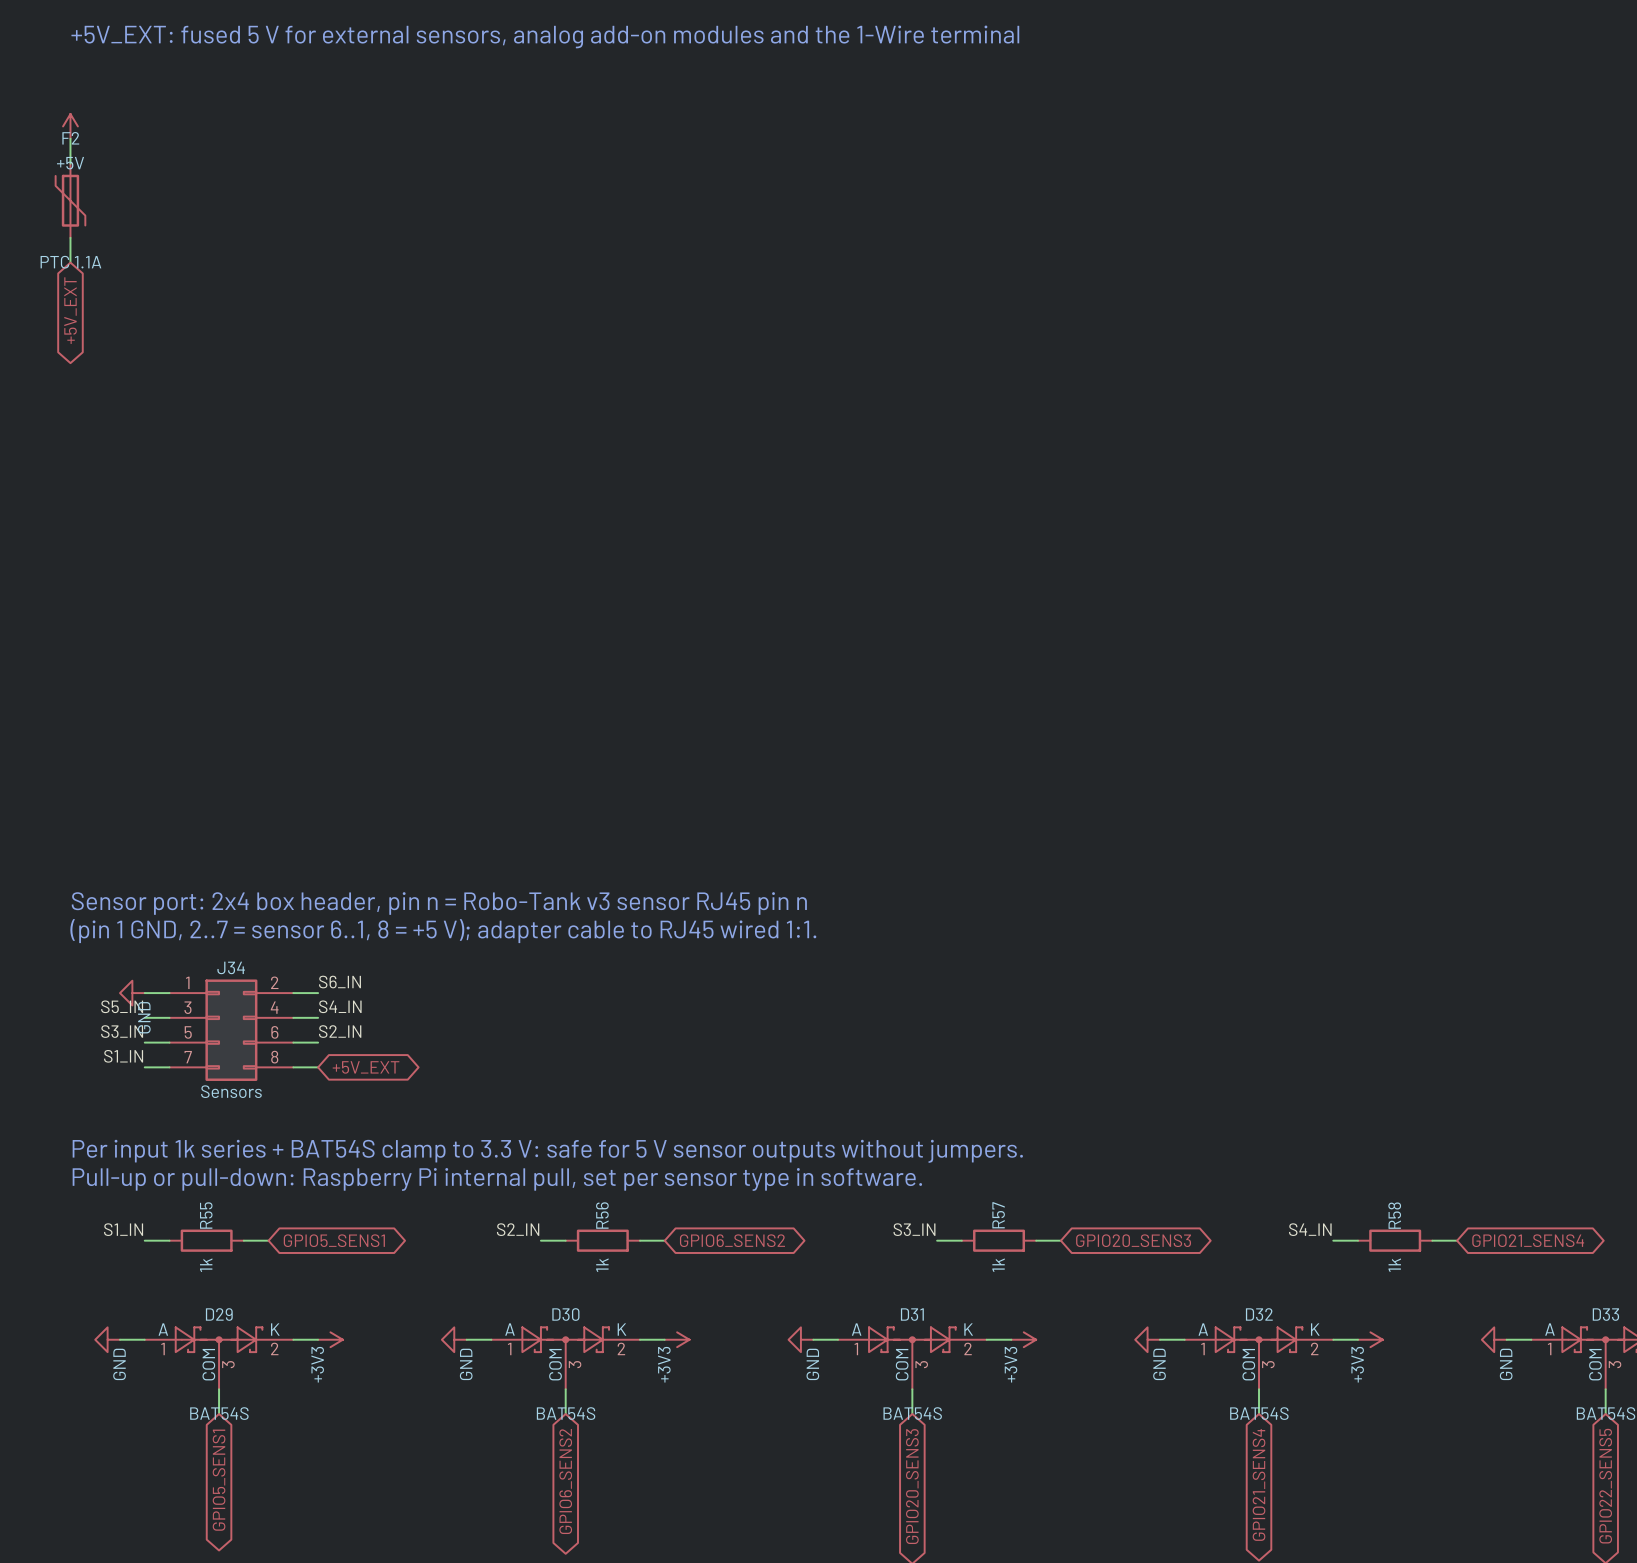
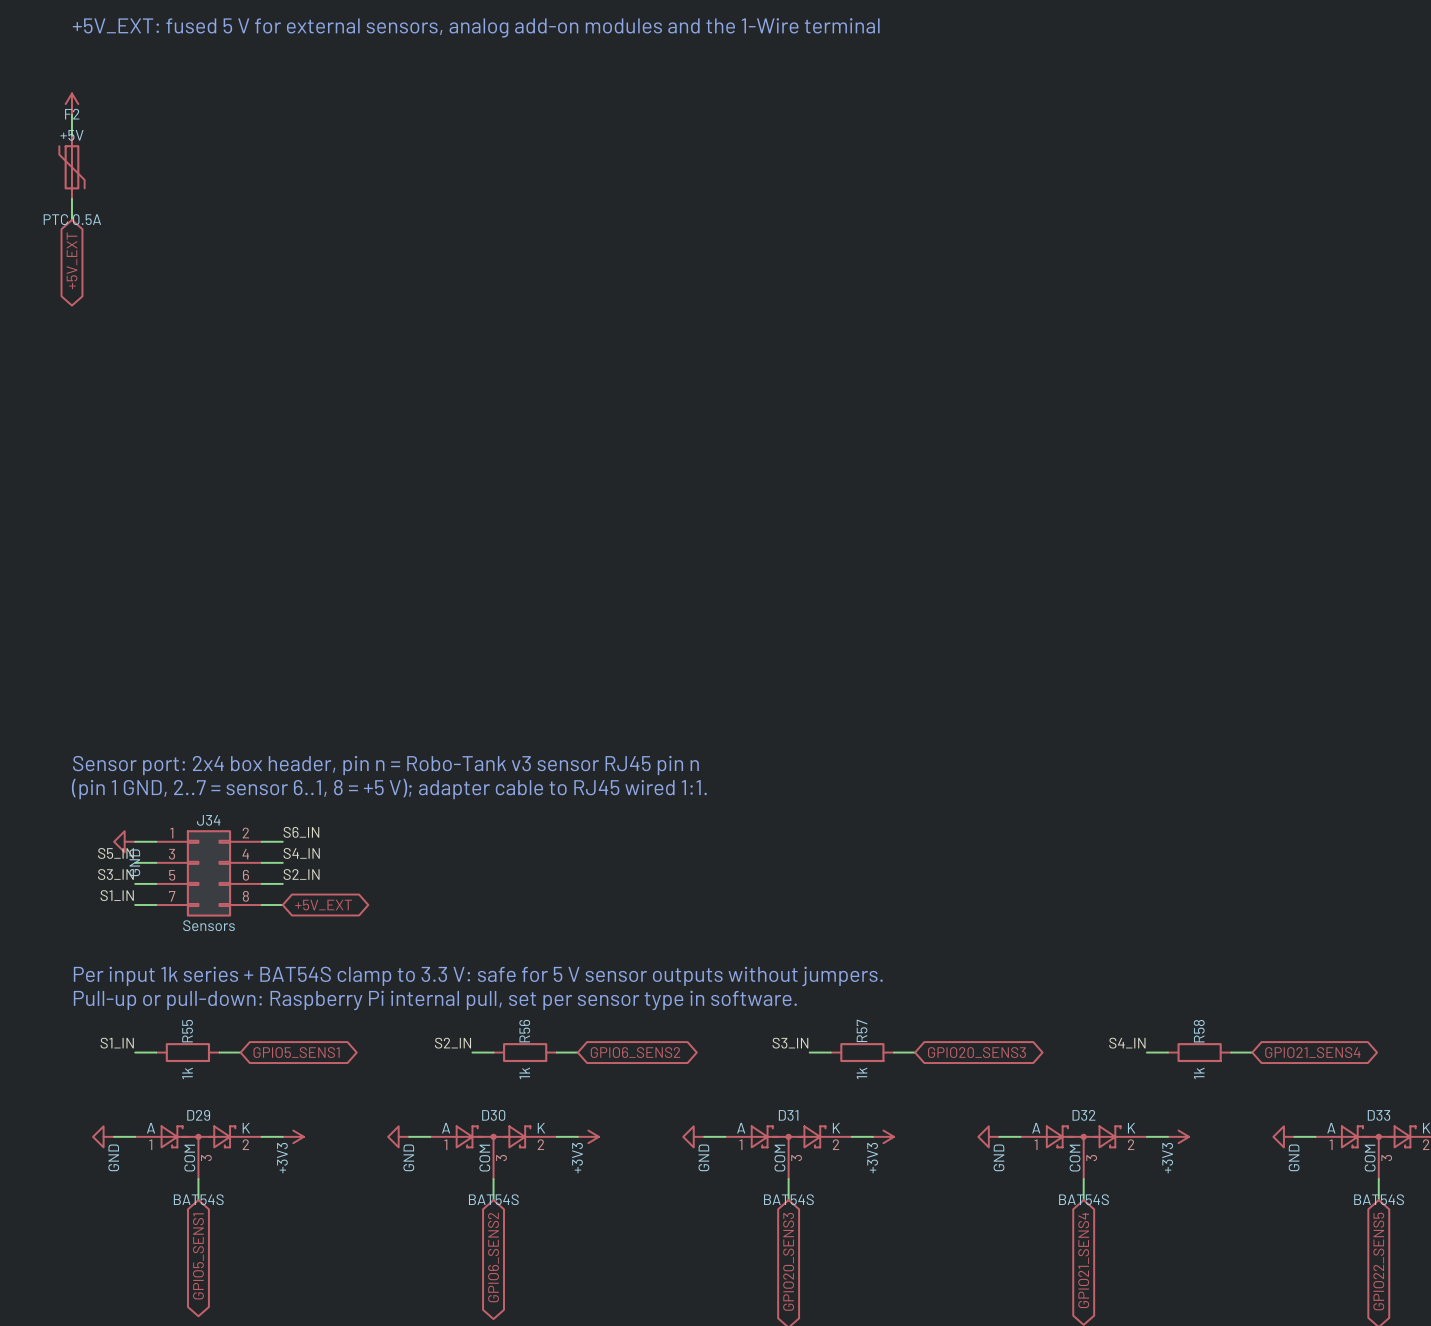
F2 value: PTC 1.1A (70, 262) -> PTC 0.5A (72, 219)

